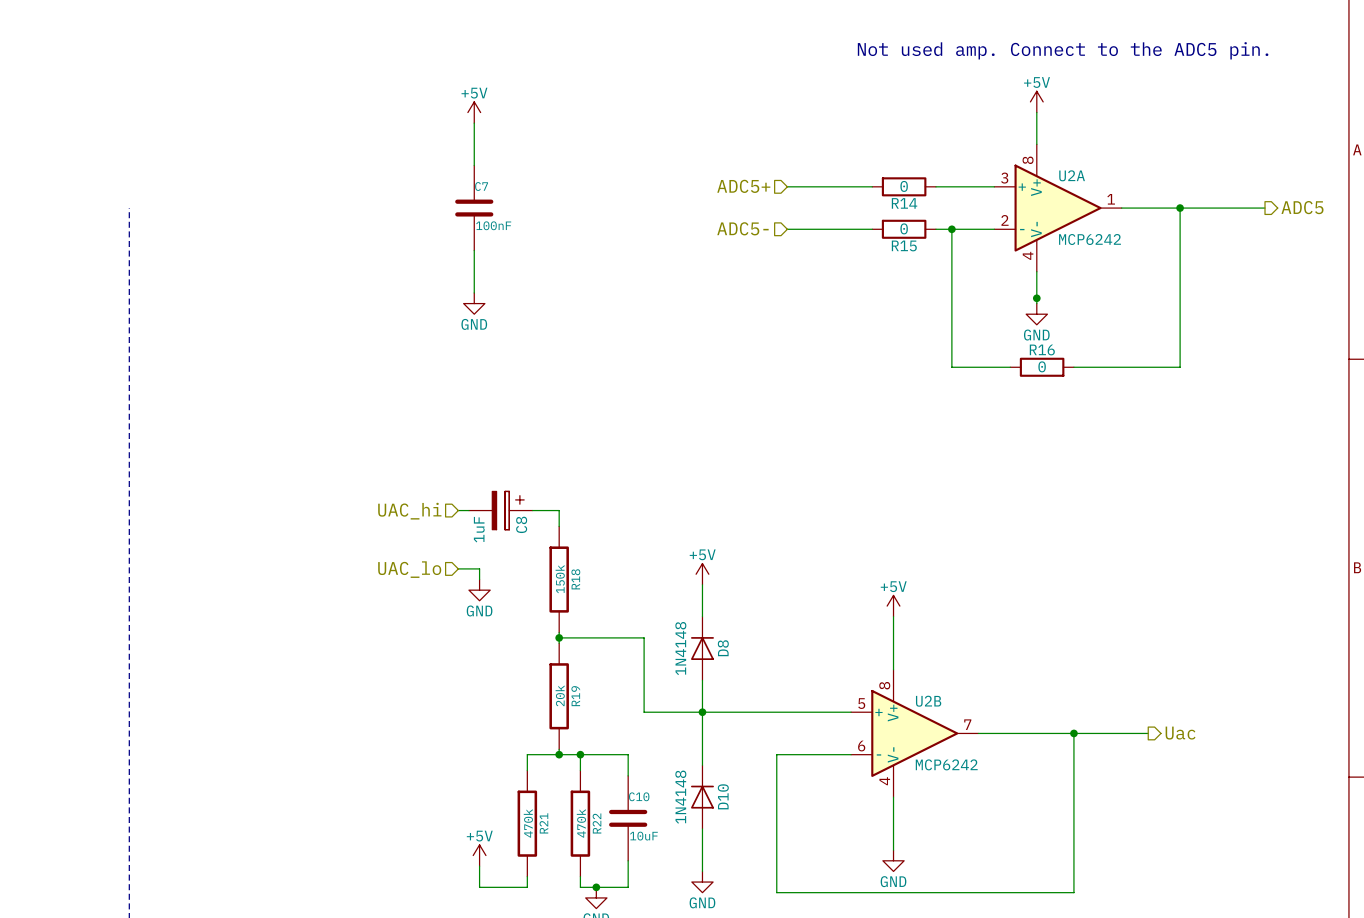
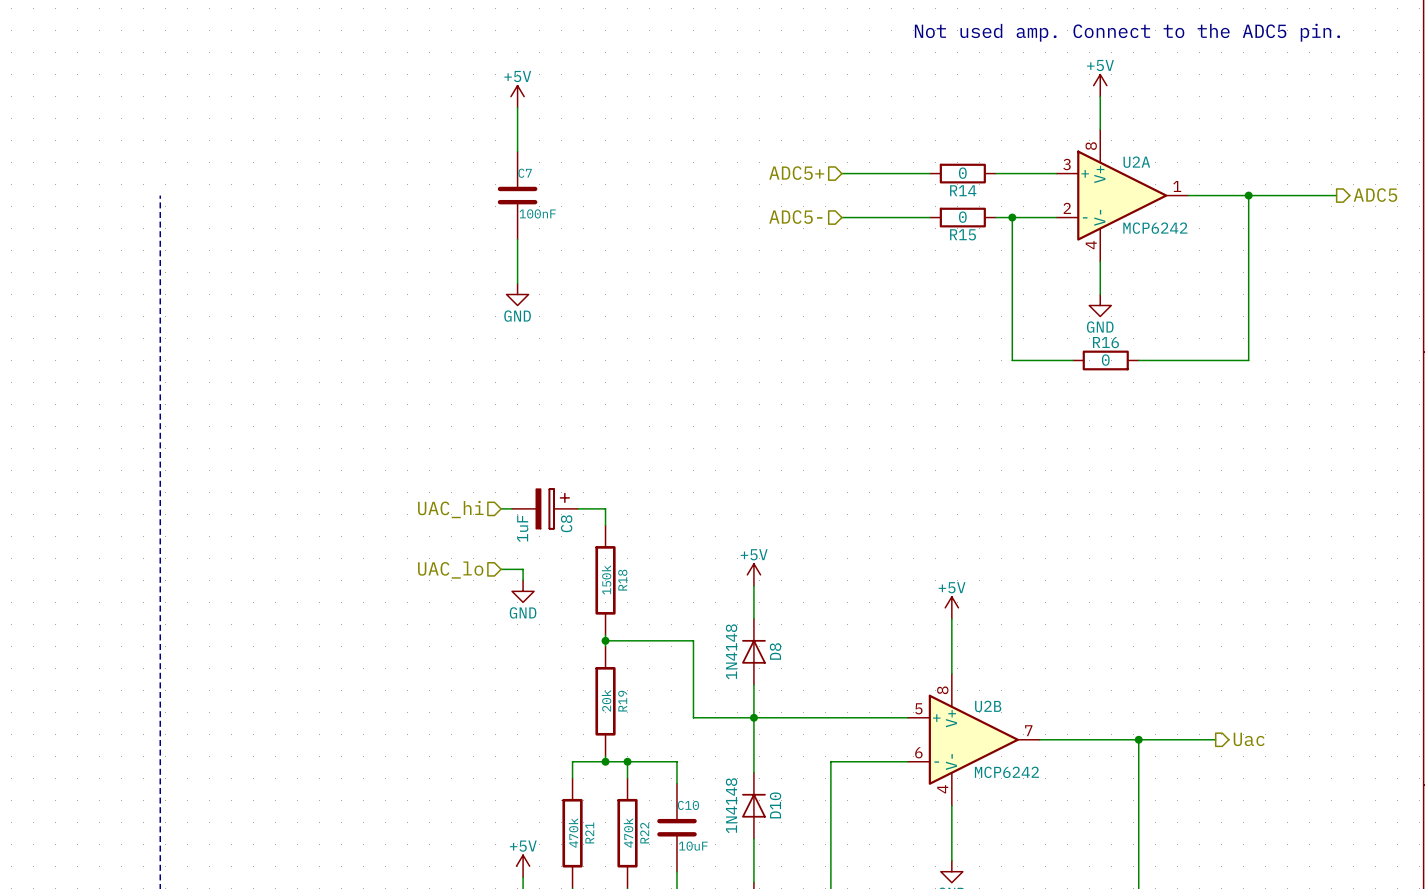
junction: (1036, 298) -> none

